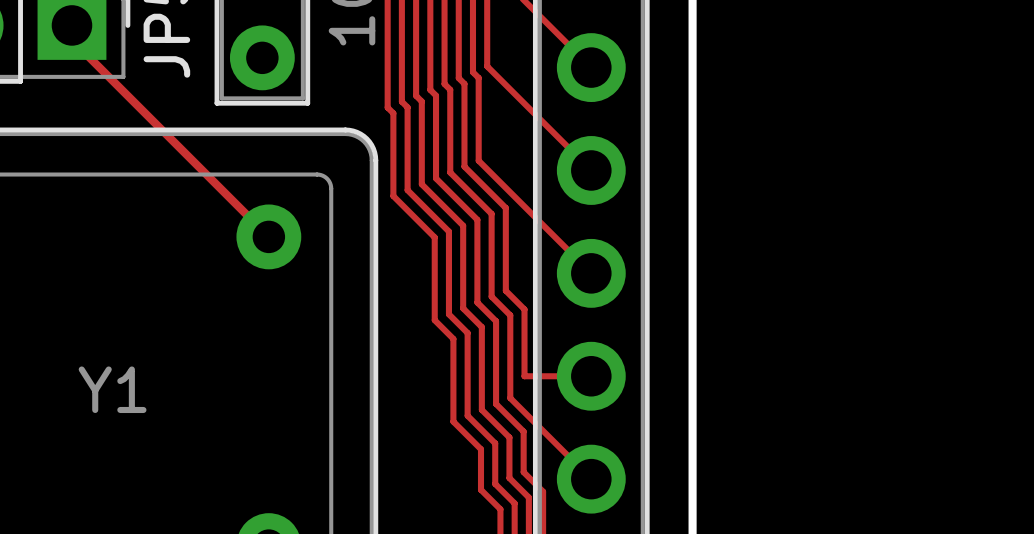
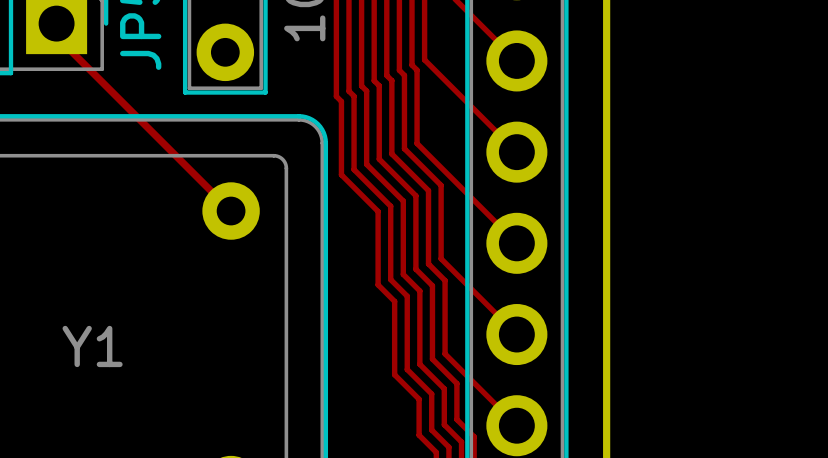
track: (524, 309) (524, 376) (591, 376) -> (457, 275) (516, 334)

